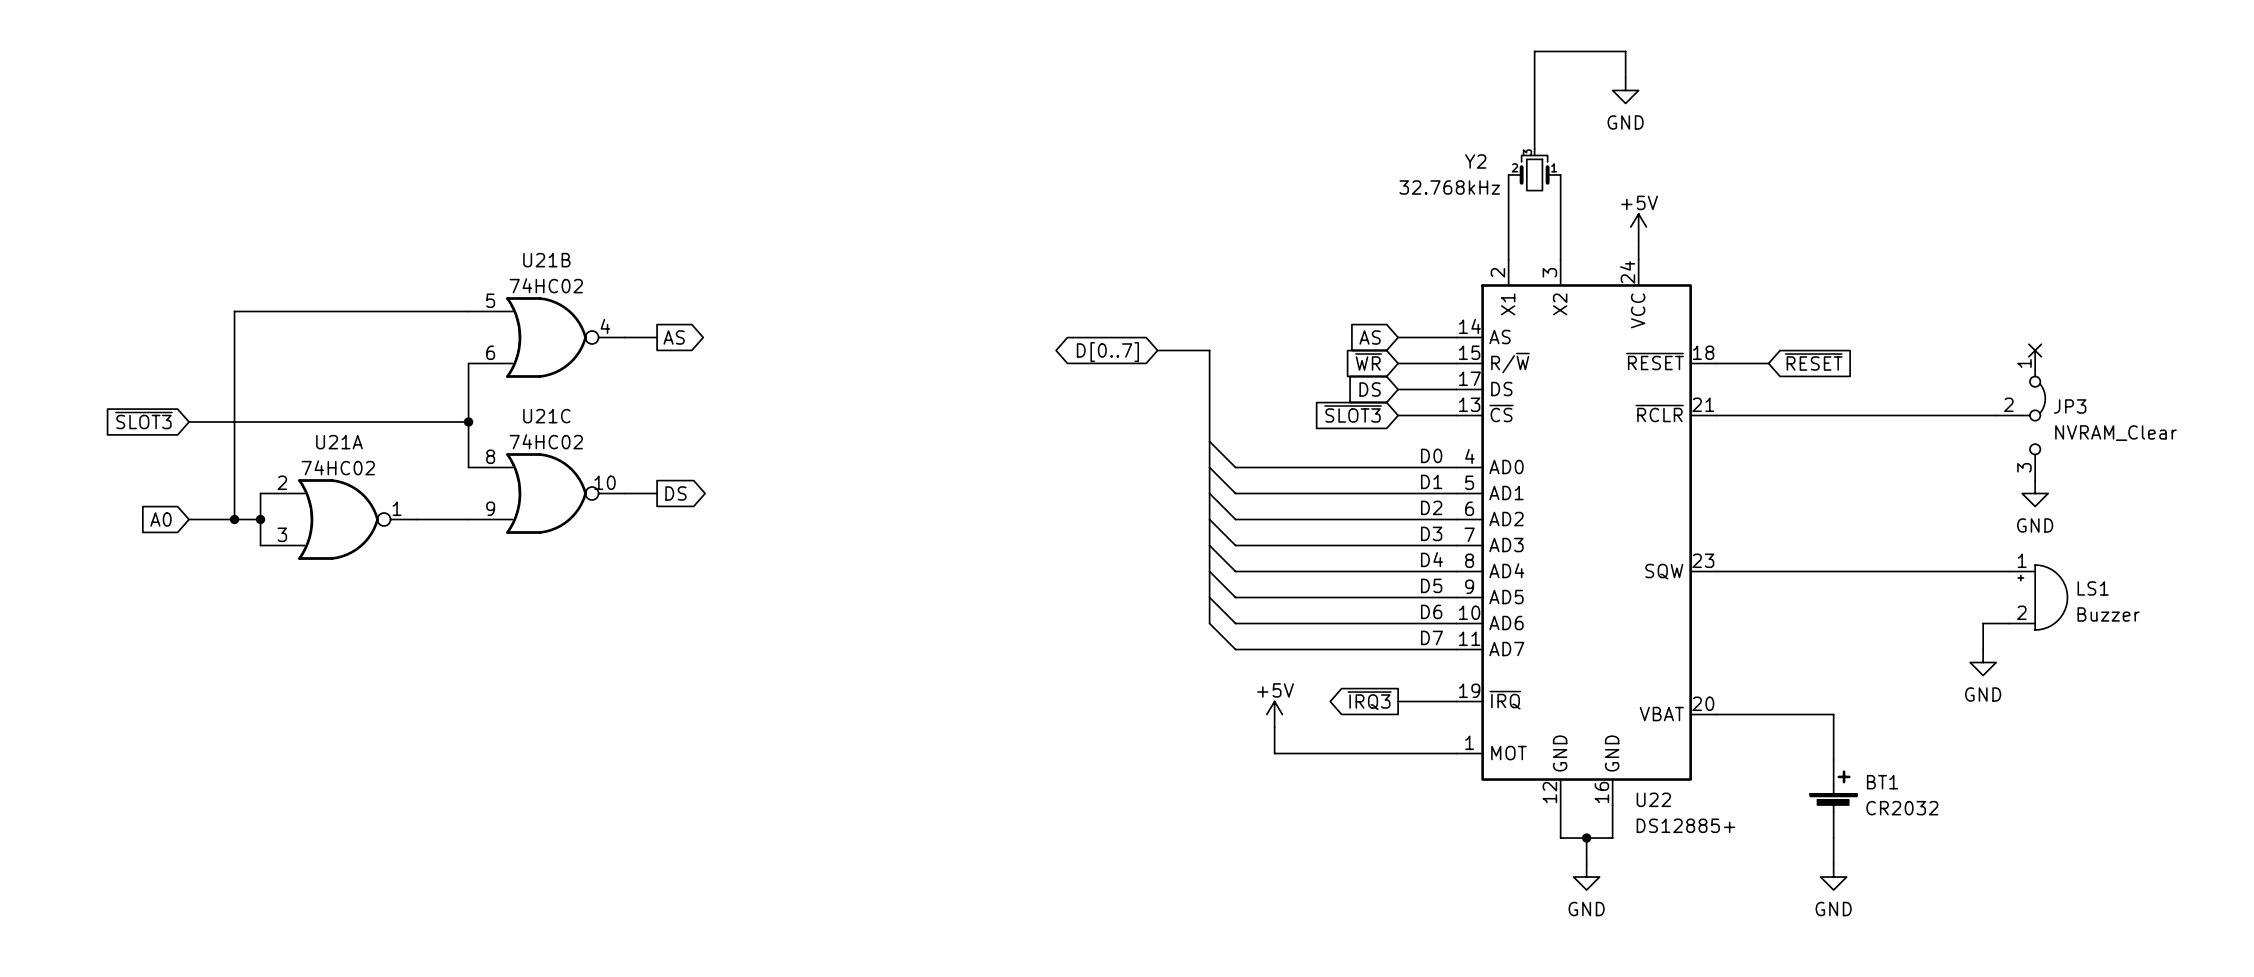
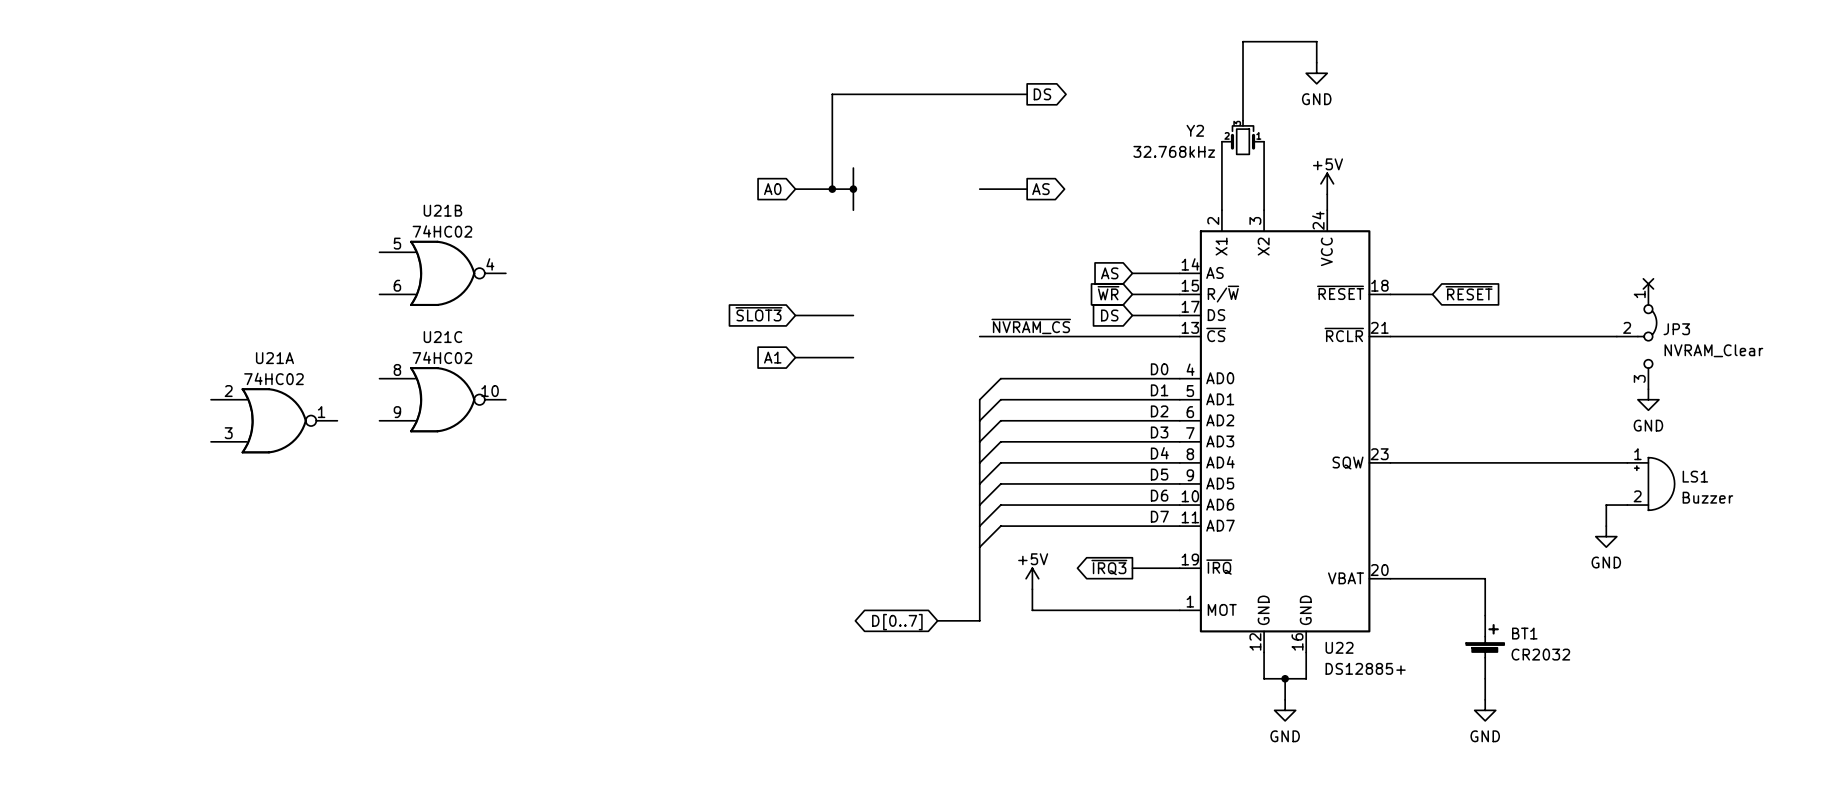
wire: none -> (1027, 94) (832, 94) (832, 189)
global label: none -> DS (1042, 94)
wire: none -> (853, 168) (853, 210)
global label: none -> A0 (772, 189)
wire: none -> (795, 189) (853, 189)
junction: none -> (832, 189)
junction: none -> (853, 189)
wire: none -> (979, 189) (1027, 189)
global label: none -> AS (1040, 189)
wire: (468, 311) (234, 311) (234, 519) -> none
wire: (624, 337) (657, 337) -> none
global label: AS (674, 337) -> none
bus: (1157, 350) (1209, 350) (1209, 493) -> none
global label: D[0..7] (1107, 352) -> none
wire: (468, 363) (468, 467) -> none
global label: none -> ~{SLOT3} (758, 314)
wire: none -> (795, 315) (853, 315)
label: none -> ~{NVRAM_CS} (1031, 326)
global label: ~{SLOT3} (1353, 414) -> none
wire: none -> (979, 336) (1132, 336)
global label: ~{SLOT3} (143, 420) -> none
wire: (189, 422) (468, 422) -> none
junction: (468, 422) -> none
global label: none -> A1 (772, 357)
wire: none -> (795, 357) (853, 357)
wire: (1209, 441) (1235, 467) -> (979, 399) (1000, 378)
wire: (1209, 467) (1235, 493) -> (979, 420) (1000, 399)
wire: (260, 493) (260, 545) -> none
wire: (624, 493) (657, 493) -> none
global label: DS (675, 493) -> none
wire: (1209, 493) (1235, 519) -> (979, 441) (1000, 420)
global label: A0 (161, 519) -> none
wire: (189, 519) (260, 519) -> none
junction: (234, 519) -> none
junction: (260, 519) -> none
wire: (416, 519) (468, 519) -> none
wire: (1209, 519) (1235, 545) -> (979, 462) (1000, 441)
wire: (1209, 545) (1235, 571) -> (979, 483) (1000, 462)
wire: (1209, 571) (1235, 597) -> (979, 505) (1000, 483)
wire: (1209, 597) (1235, 623) -> (979, 526) (1000, 505)
wire: (1209, 623) (1235, 649) -> (979, 547) (1000, 526)
bus: none -> (979, 505) (979, 620) (937, 620)
global label: none -> D[0..7] (897, 622)

